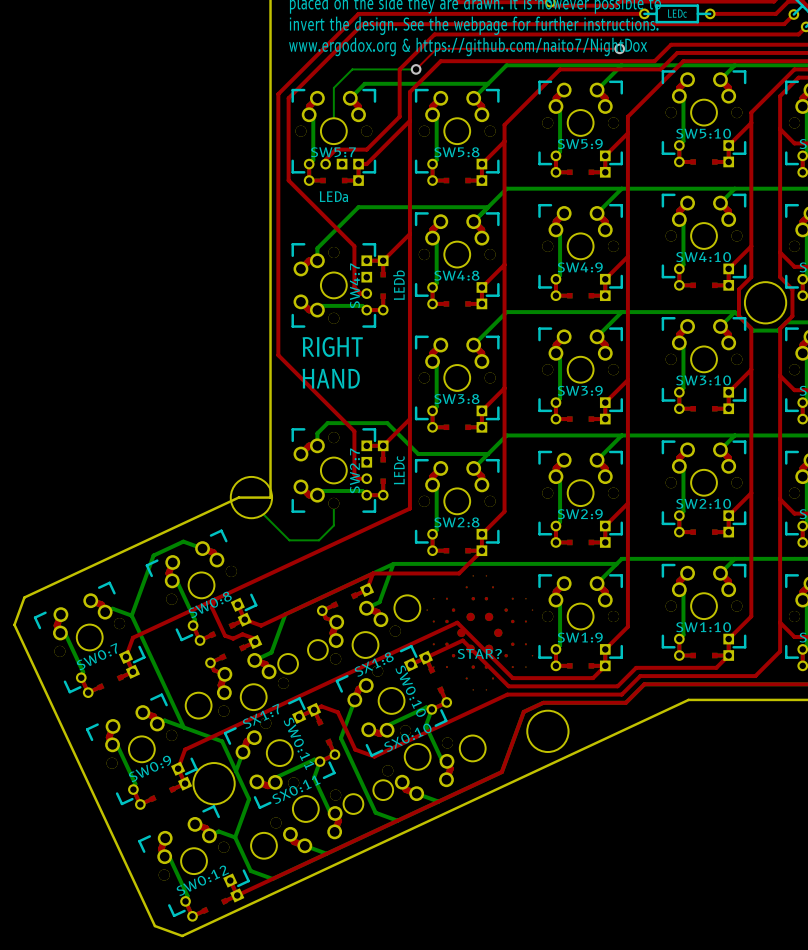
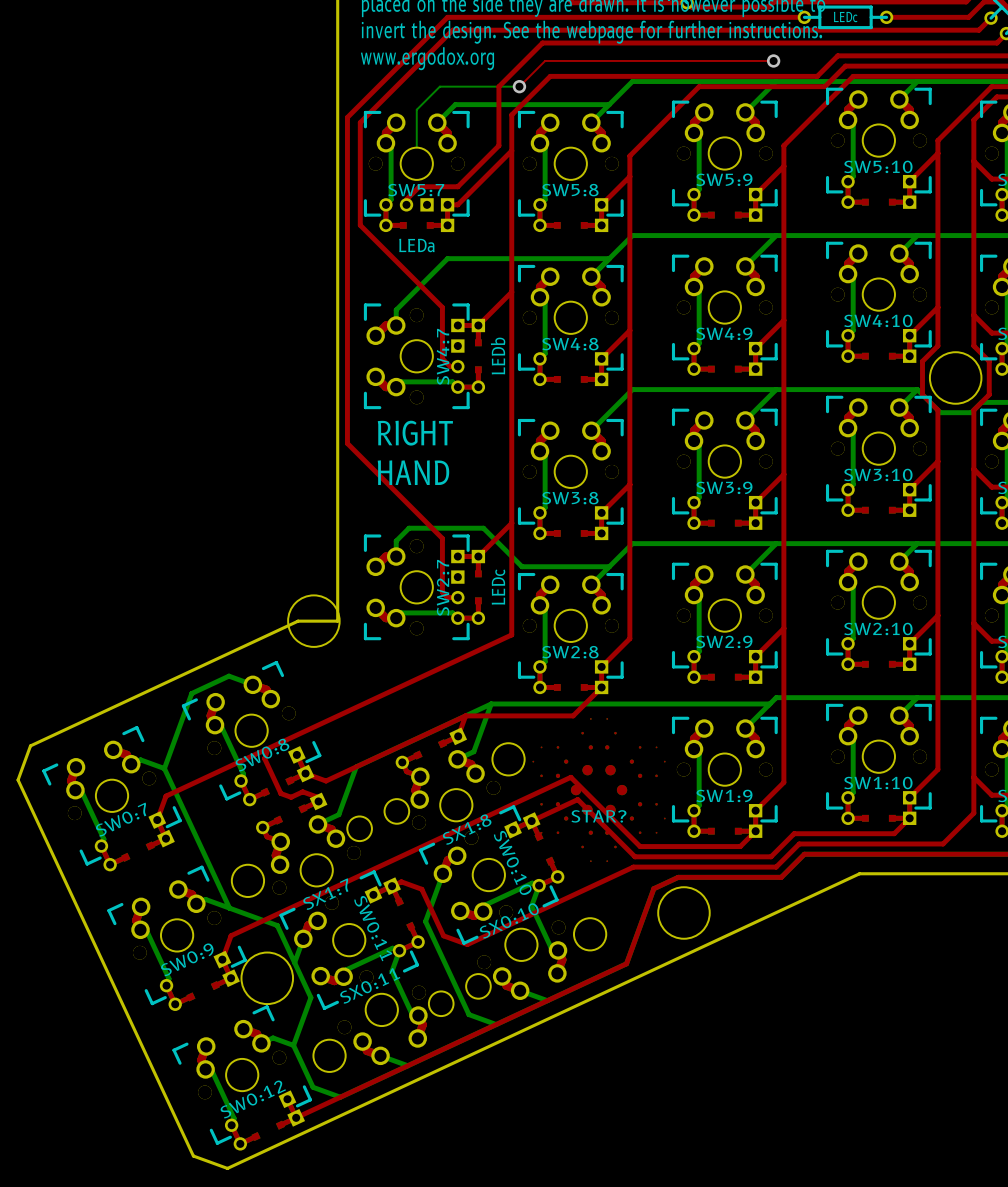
text: www.ergodox.org & https://github.com/naito7/NightDox (468, 46) -> www.ergodox.org (427, 58)
bottom track: (251, 497) (251, 502) (289, 540) (319, 540) (333, 525) (333, 503) -> none

